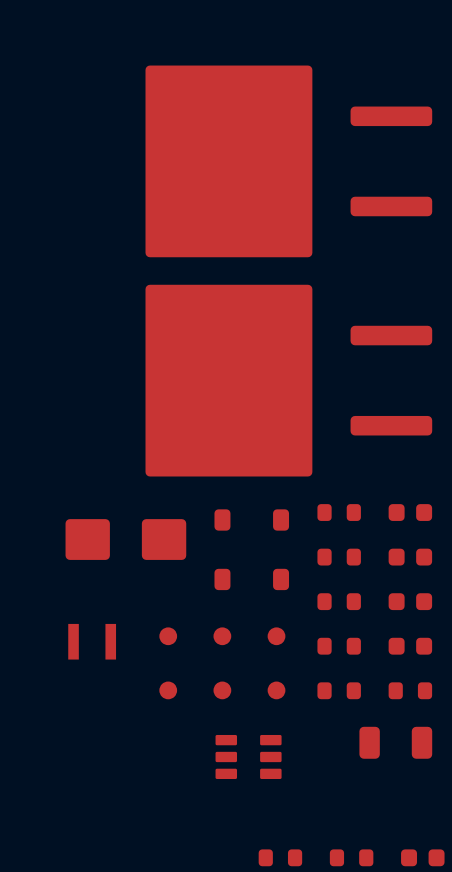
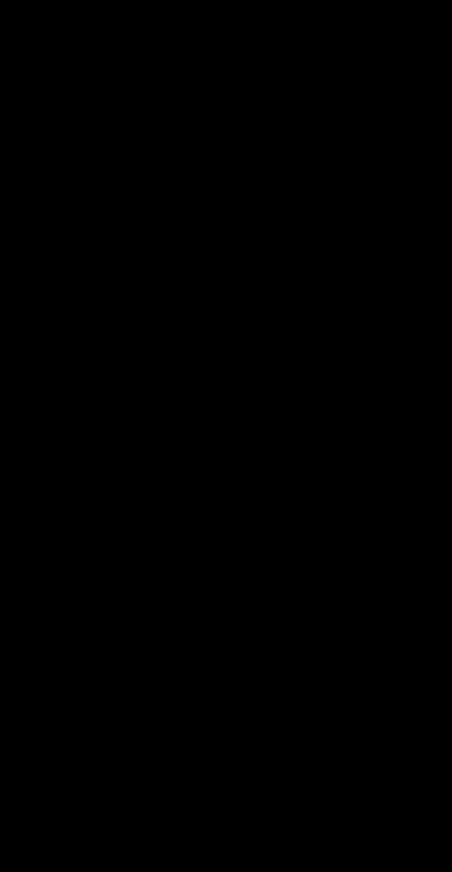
part: (288, 161) -> none
part: (288, 380) -> none
part: (339, 512) -> none
part: (410, 512) -> none
part: (251, 519) -> none
part: (125, 539) -> none
part: (339, 557) -> none
part: (410, 557) -> none
part: (251, 579) -> none
part: (339, 601) -> none
part: (410, 601) -> none
part: (168, 636) -> none
part: (222, 636) -> none
part: (276, 636) -> none
part: (92, 641) -> none
part: (339, 646) -> none
part: (410, 646) -> none
part: (168, 690) -> none
part: (222, 690) -> none
part: (276, 690) -> none
part: (339, 690) -> none
part: (410, 690) -> none
part: (395, 742) -> none
part: (248, 756) -> none
part: (280, 857) -> none
part: (351, 857) -> none
part: (422, 857) -> none

